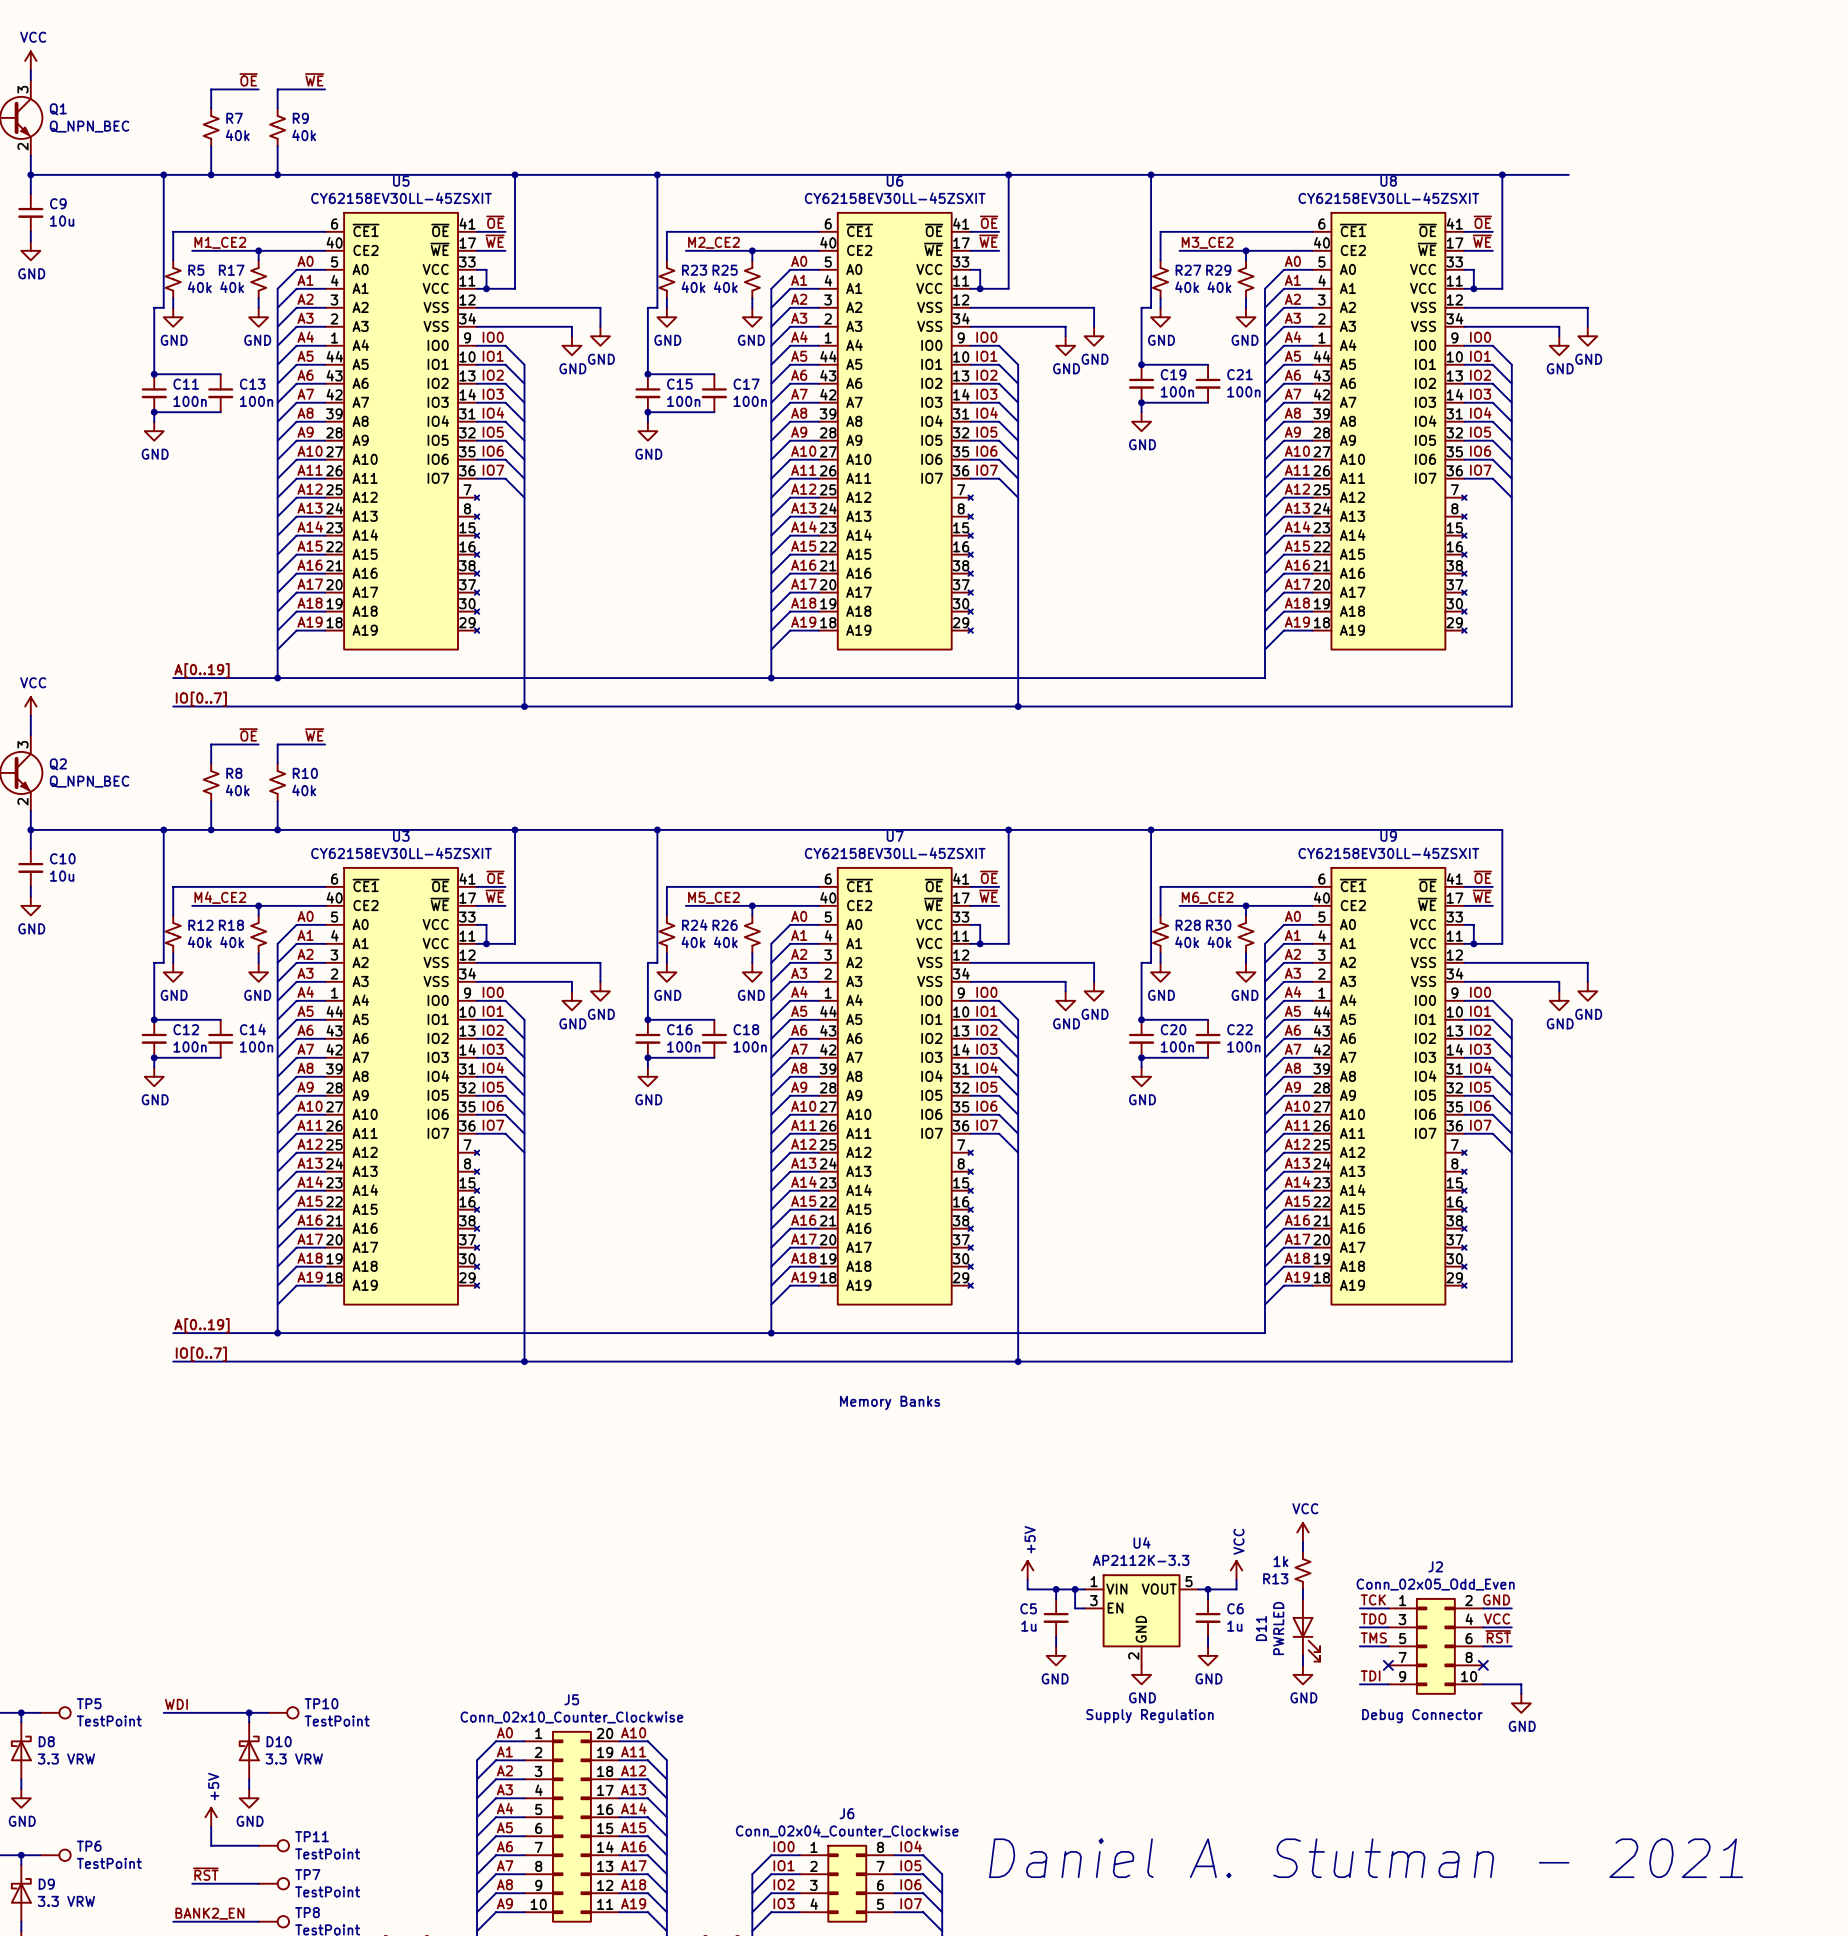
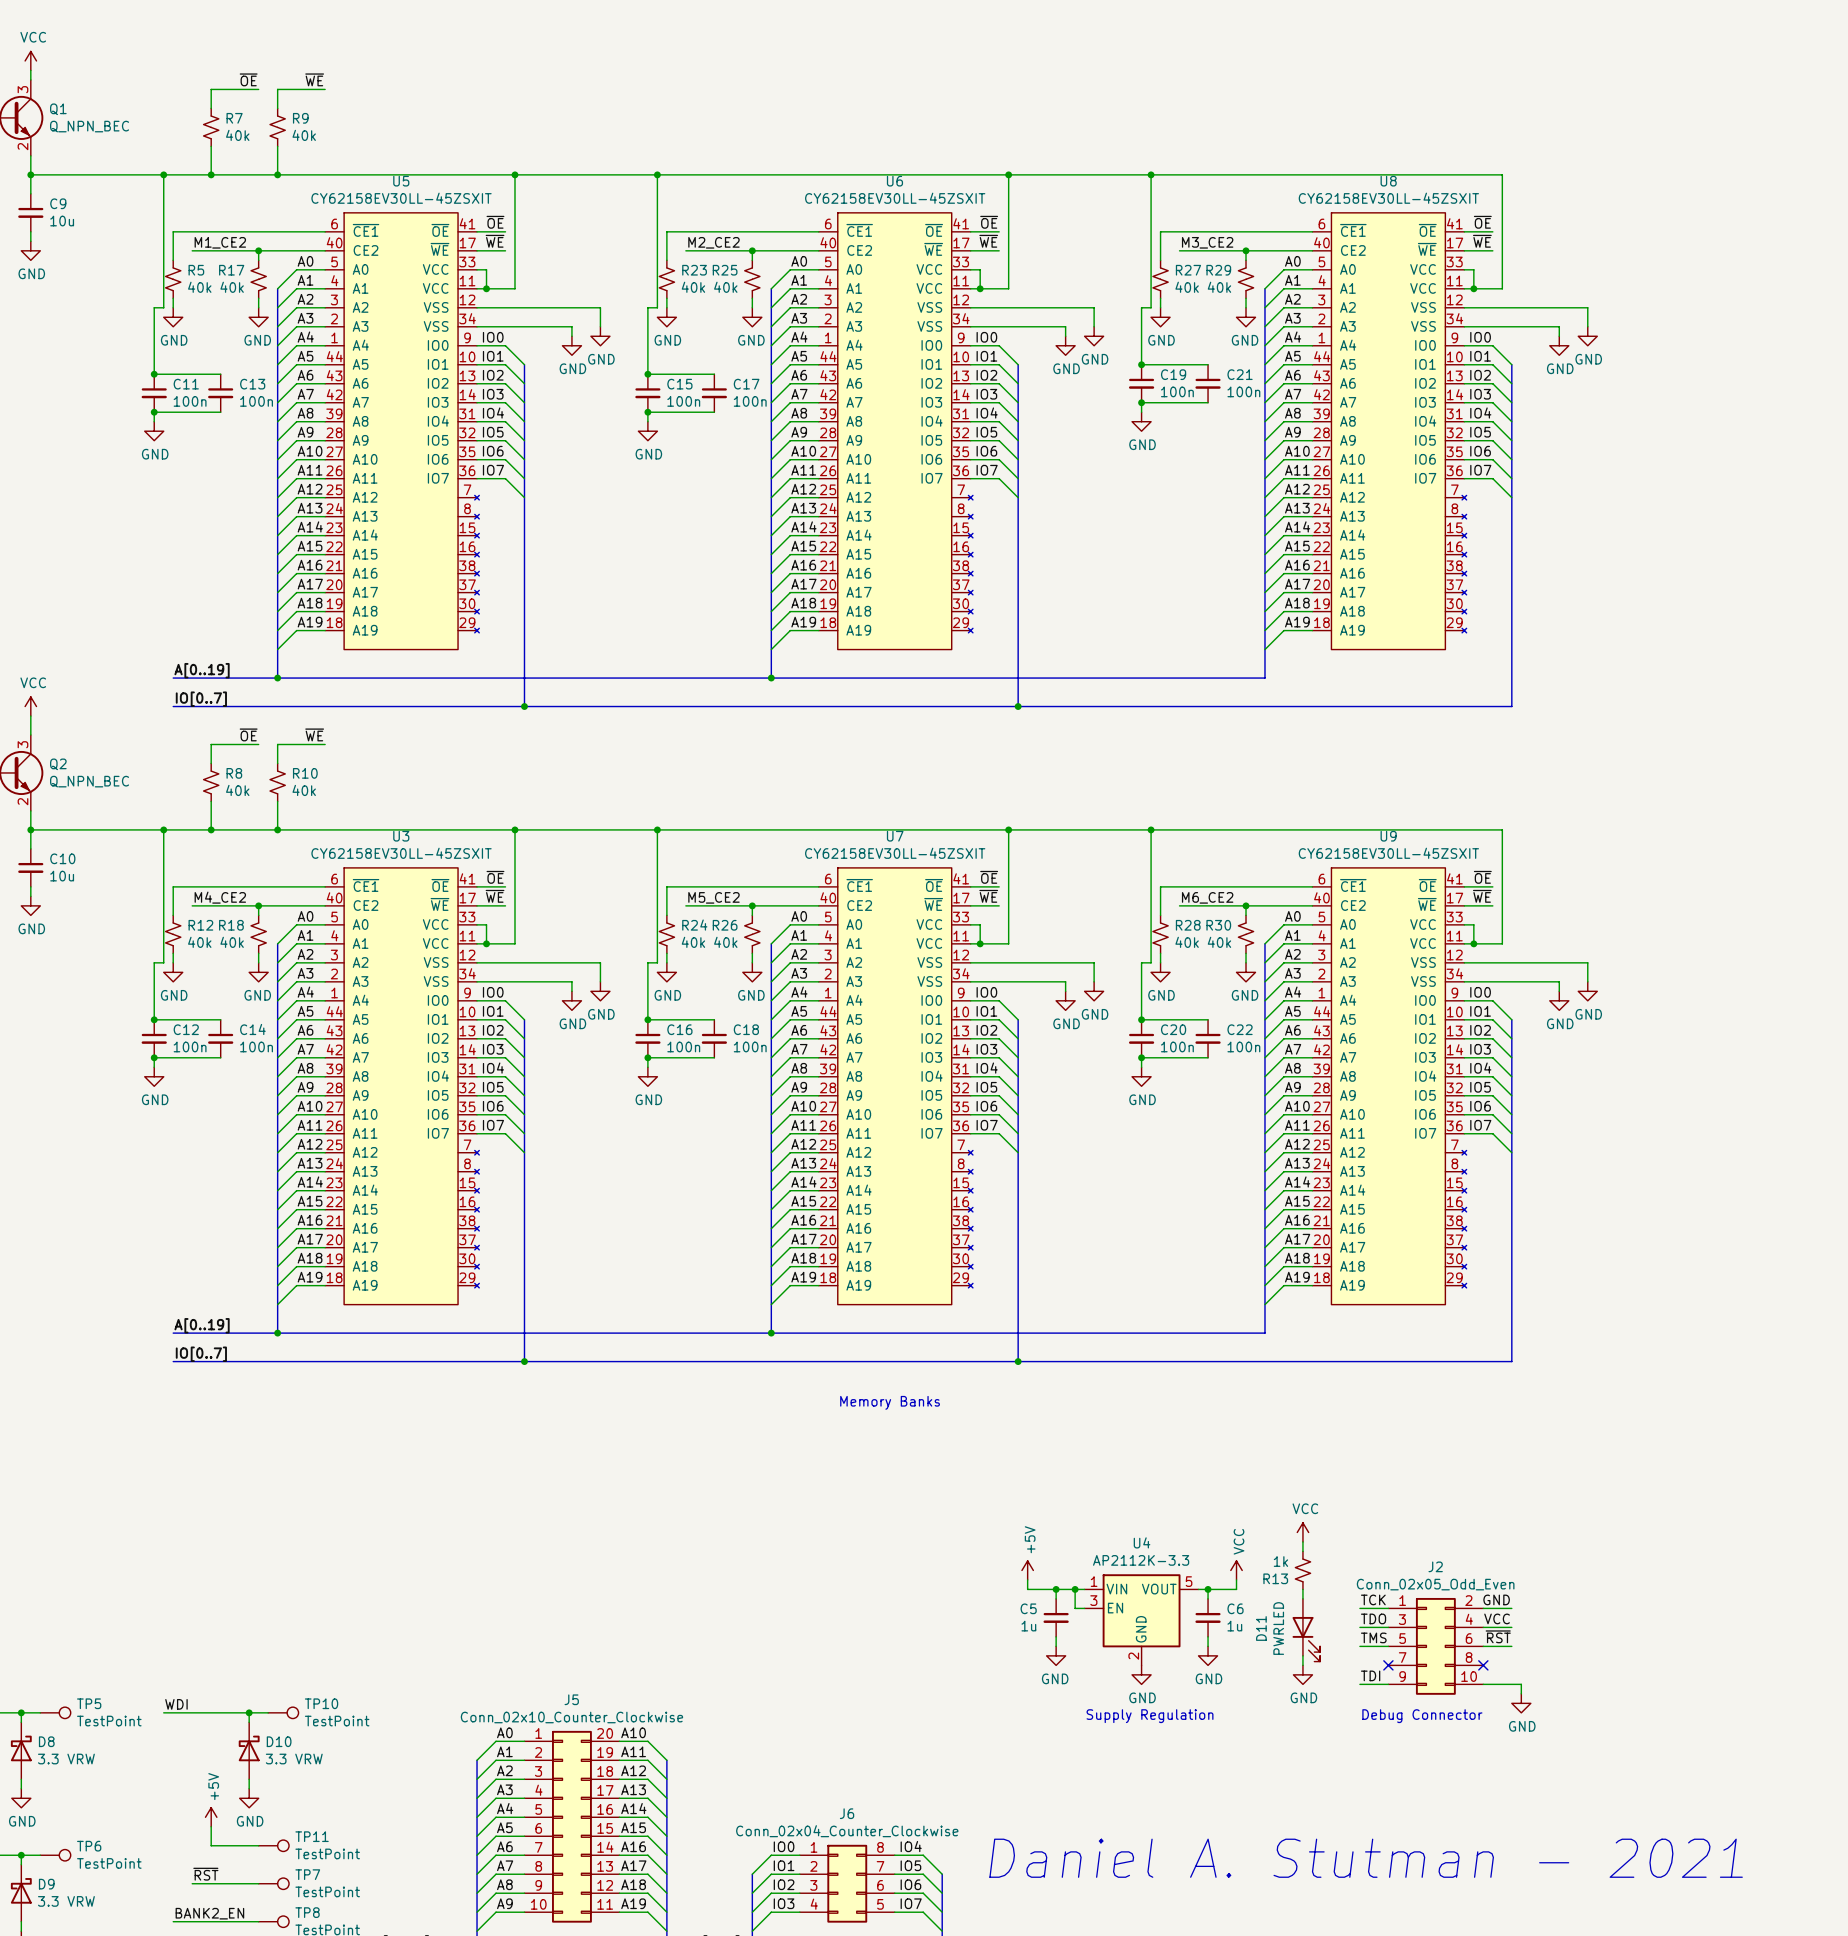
wire: (1502, 174) (1568, 174) -> none
junction: (1502, 174) -> none

